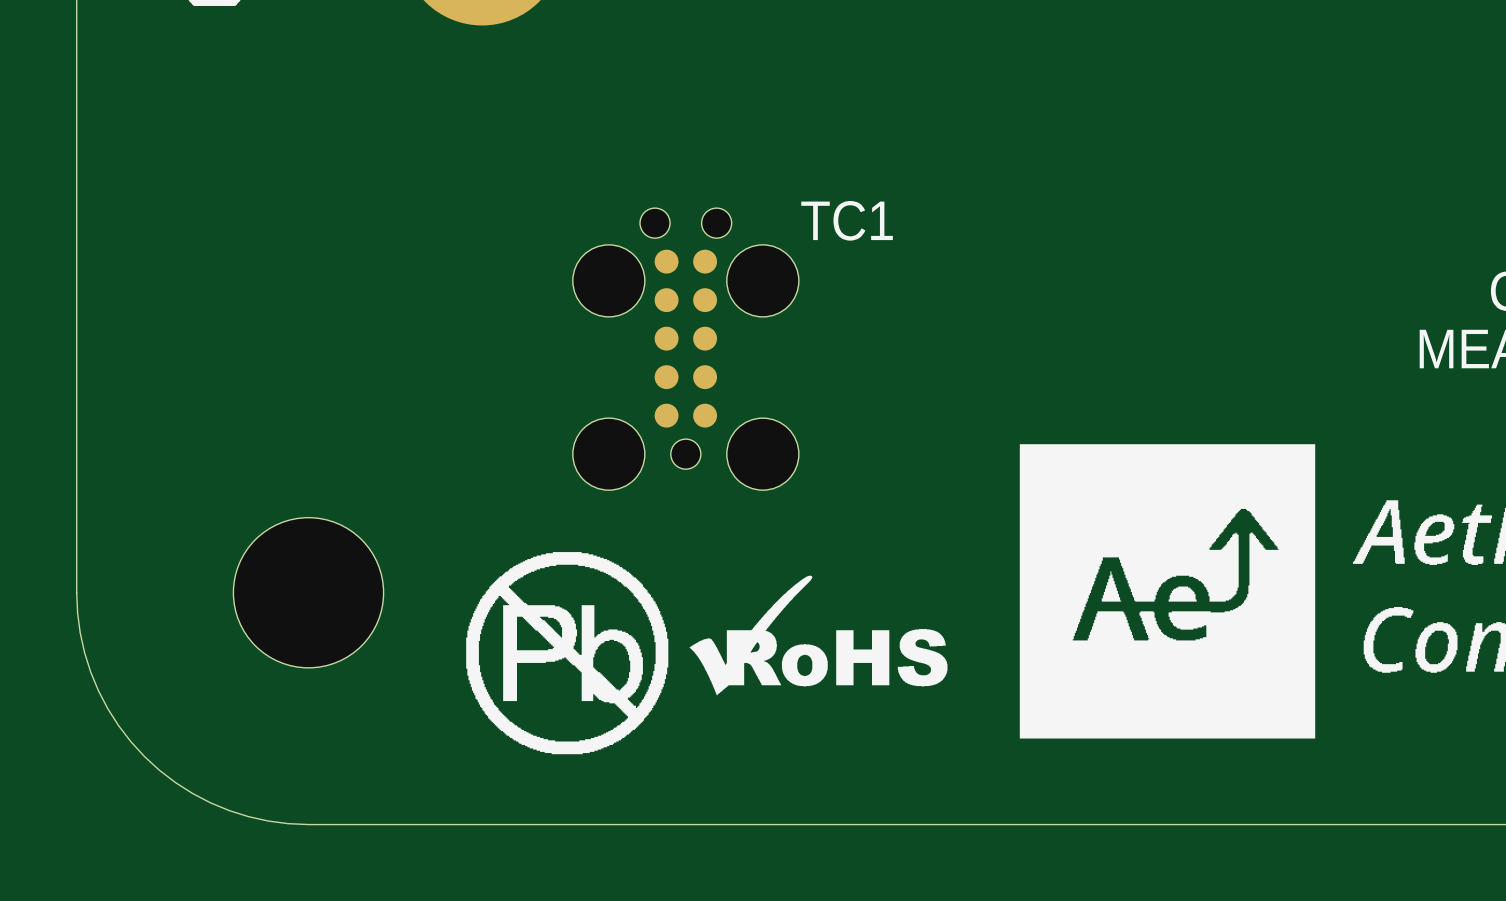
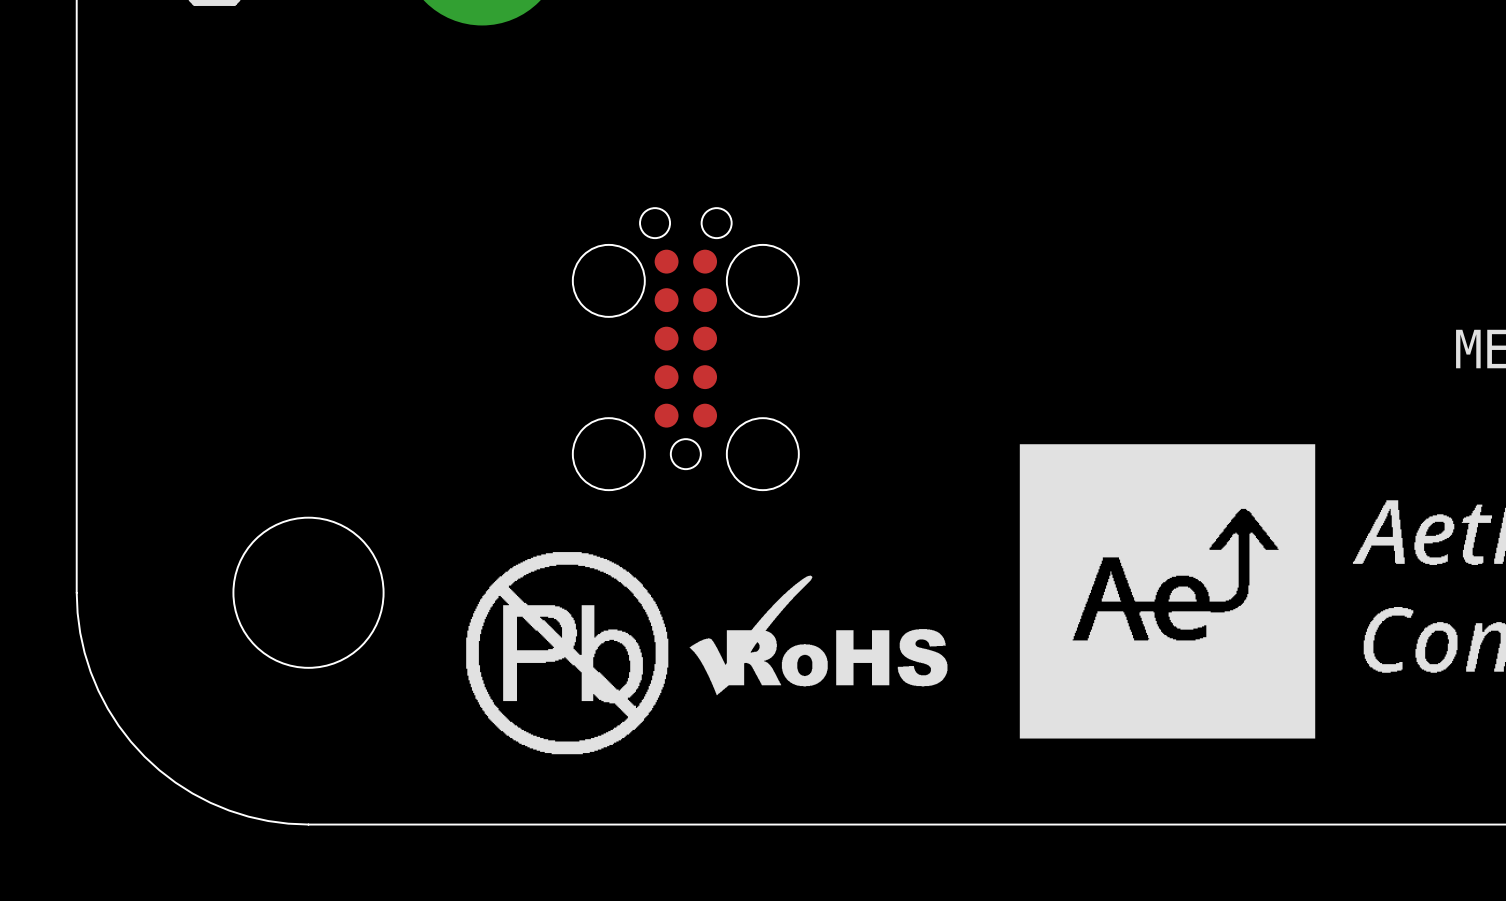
TC1 name: TC1 (847, 220) -> none

